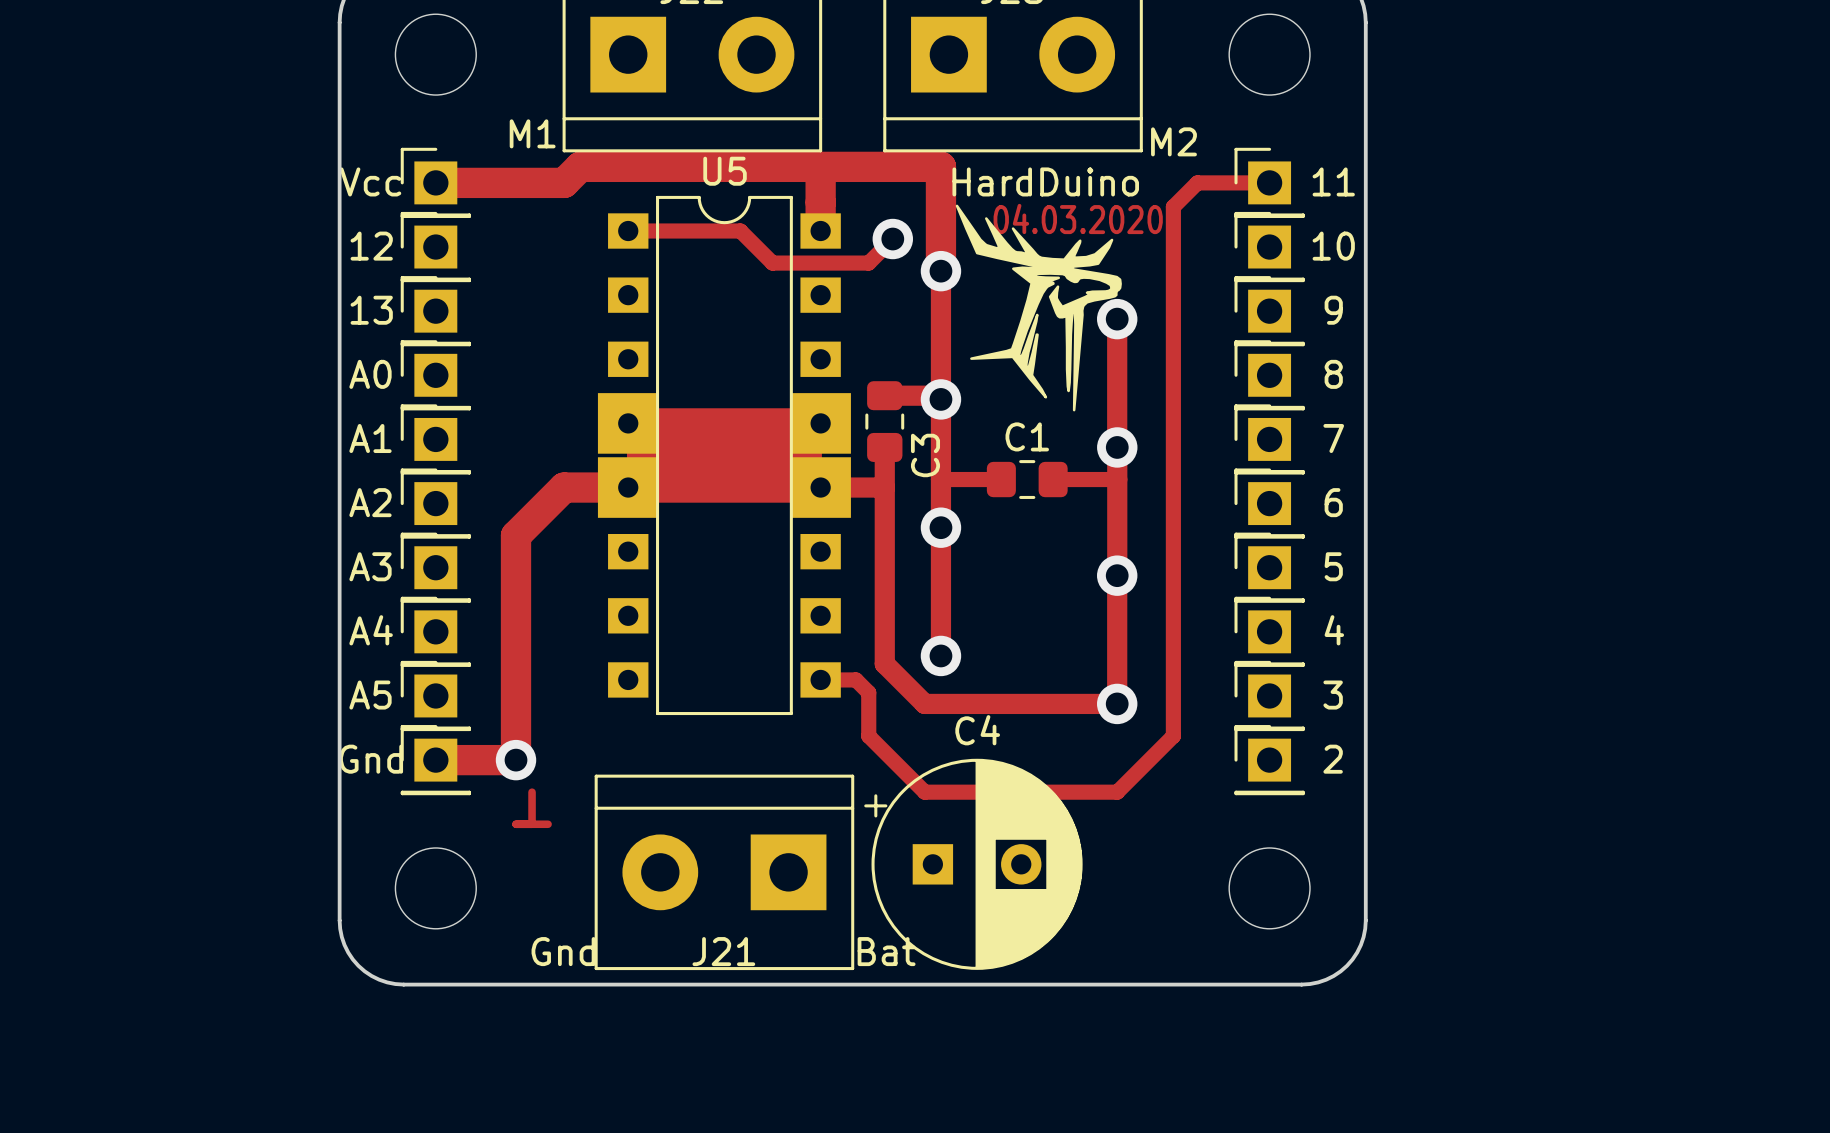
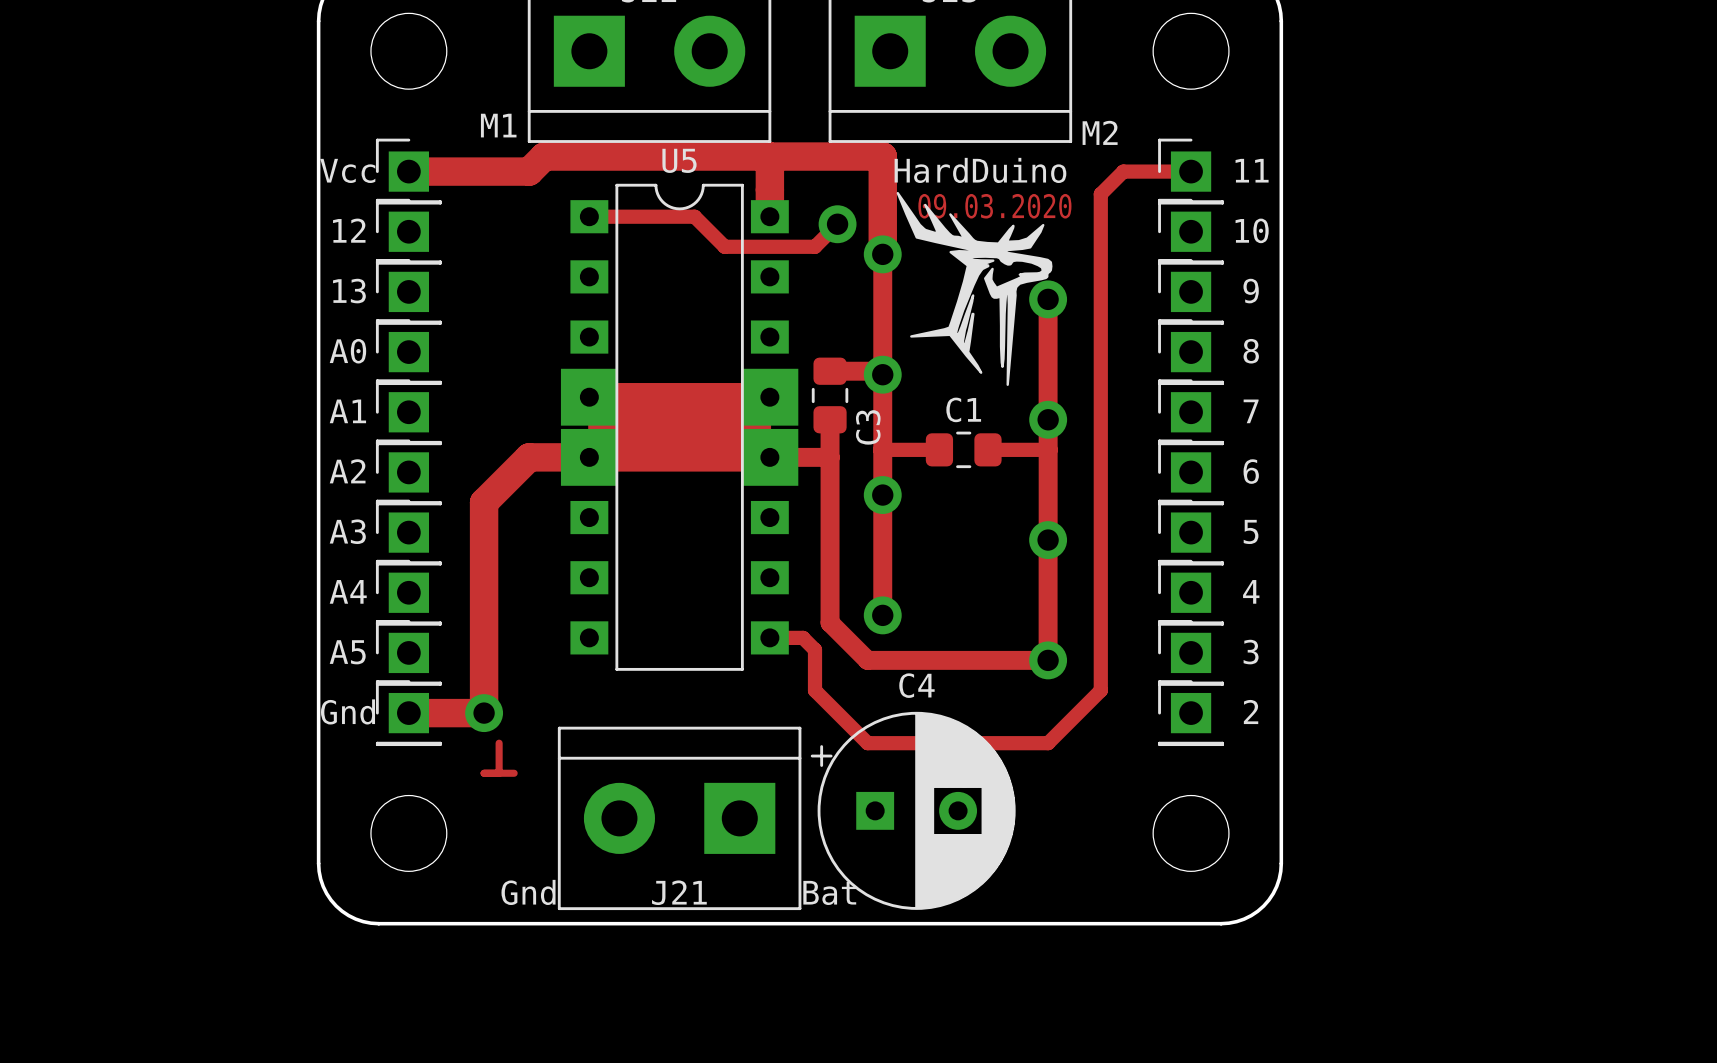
text: 04.03.2020 (1078, 218) -> 09.03.2020 (994, 206)

